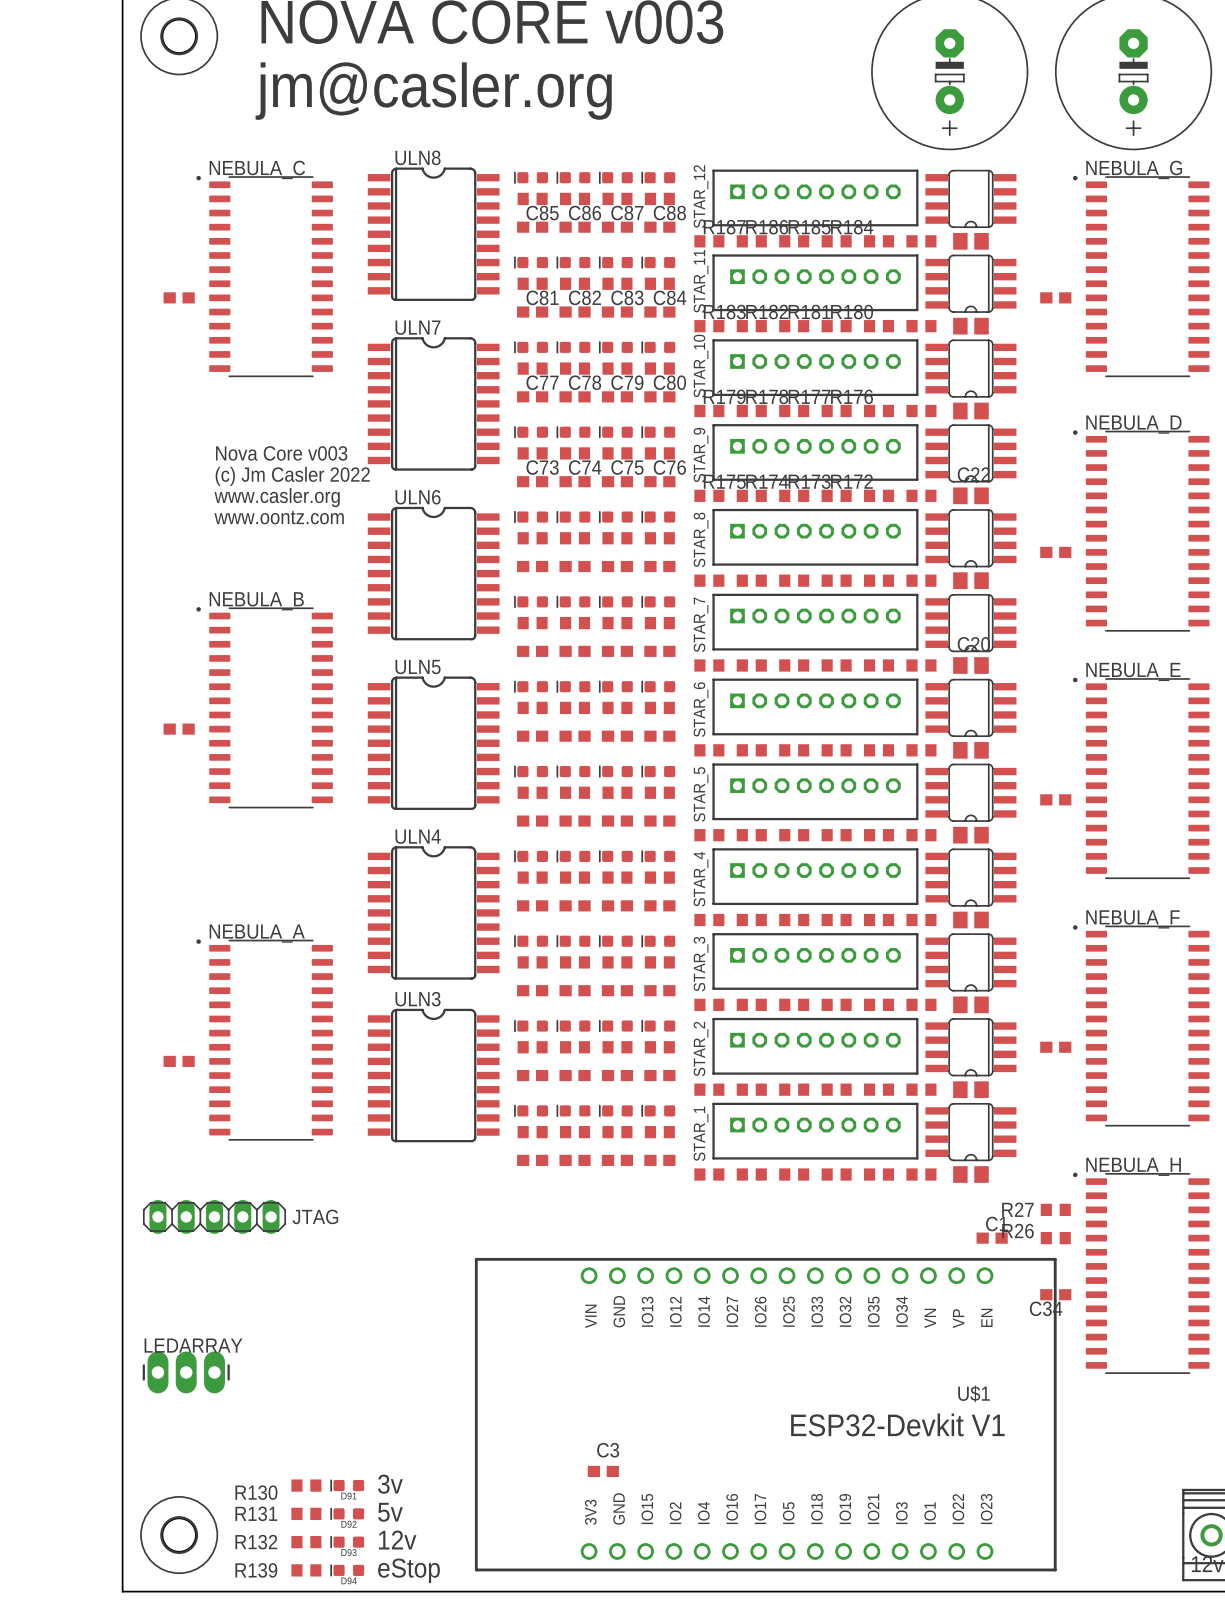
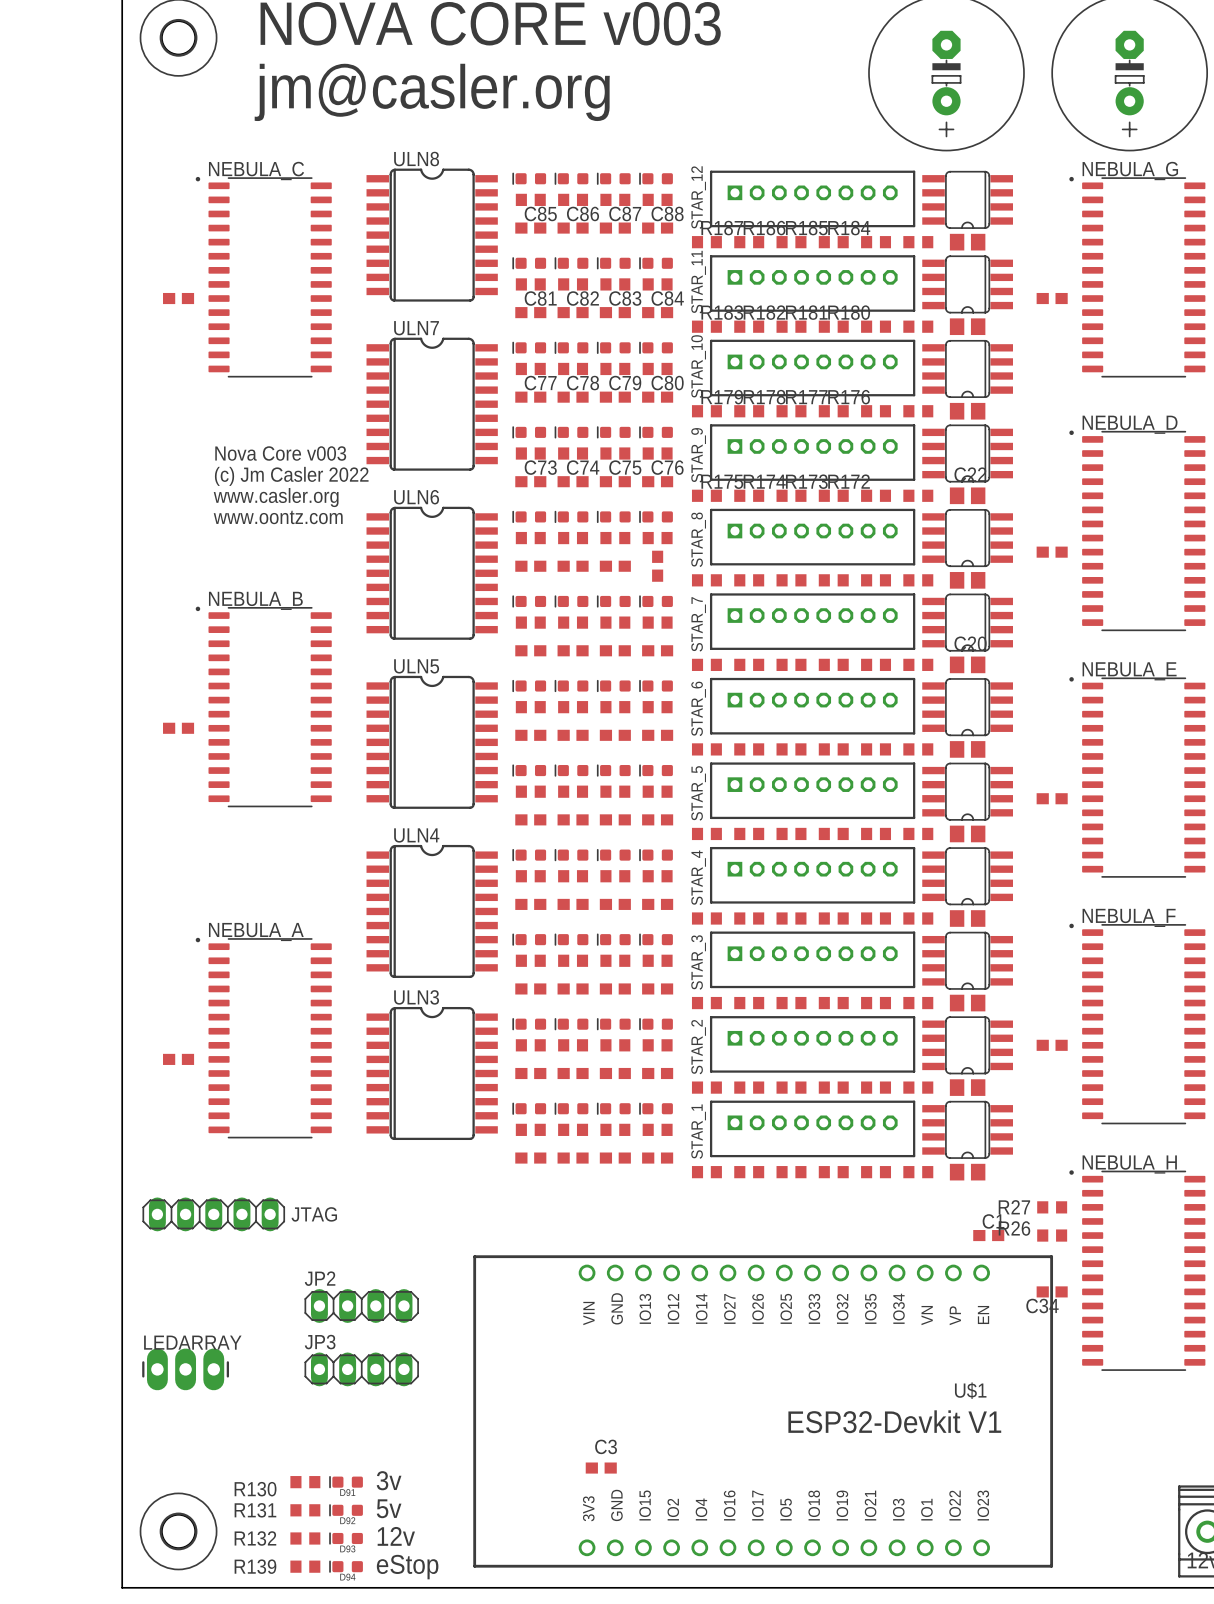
part rotation: 0° (659, 566) -> 90° clockwise (657, 566)
JP2: none -> (361, 1306)
JP3: none -> (361, 1369)

